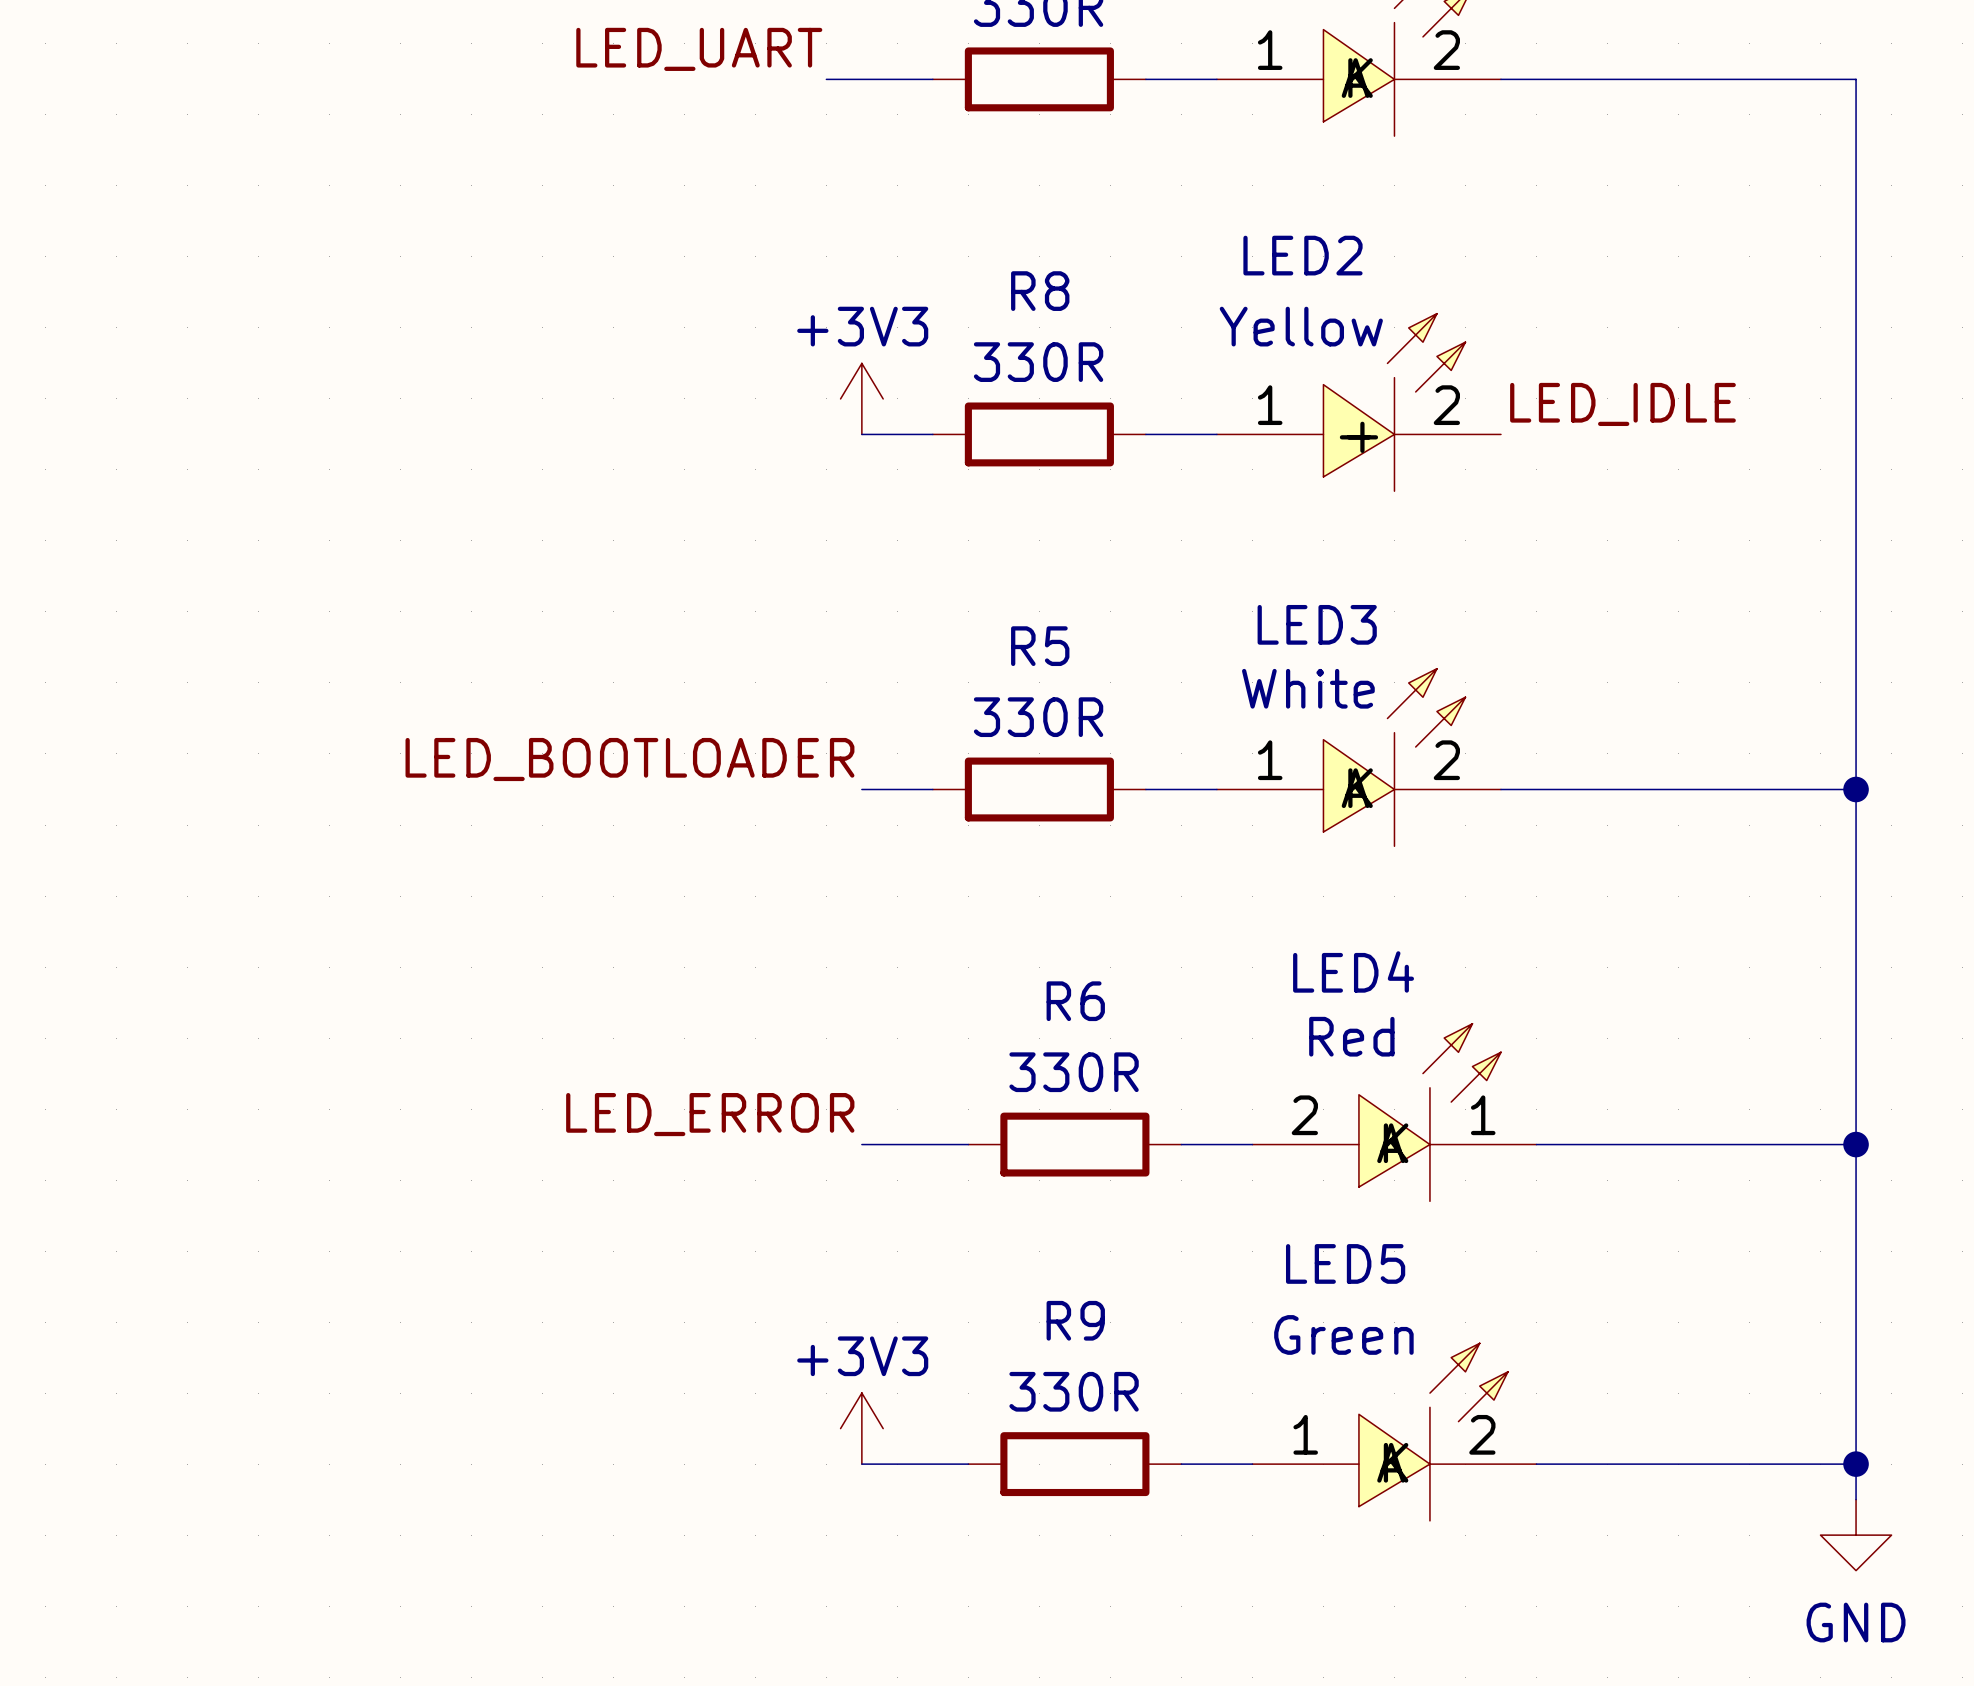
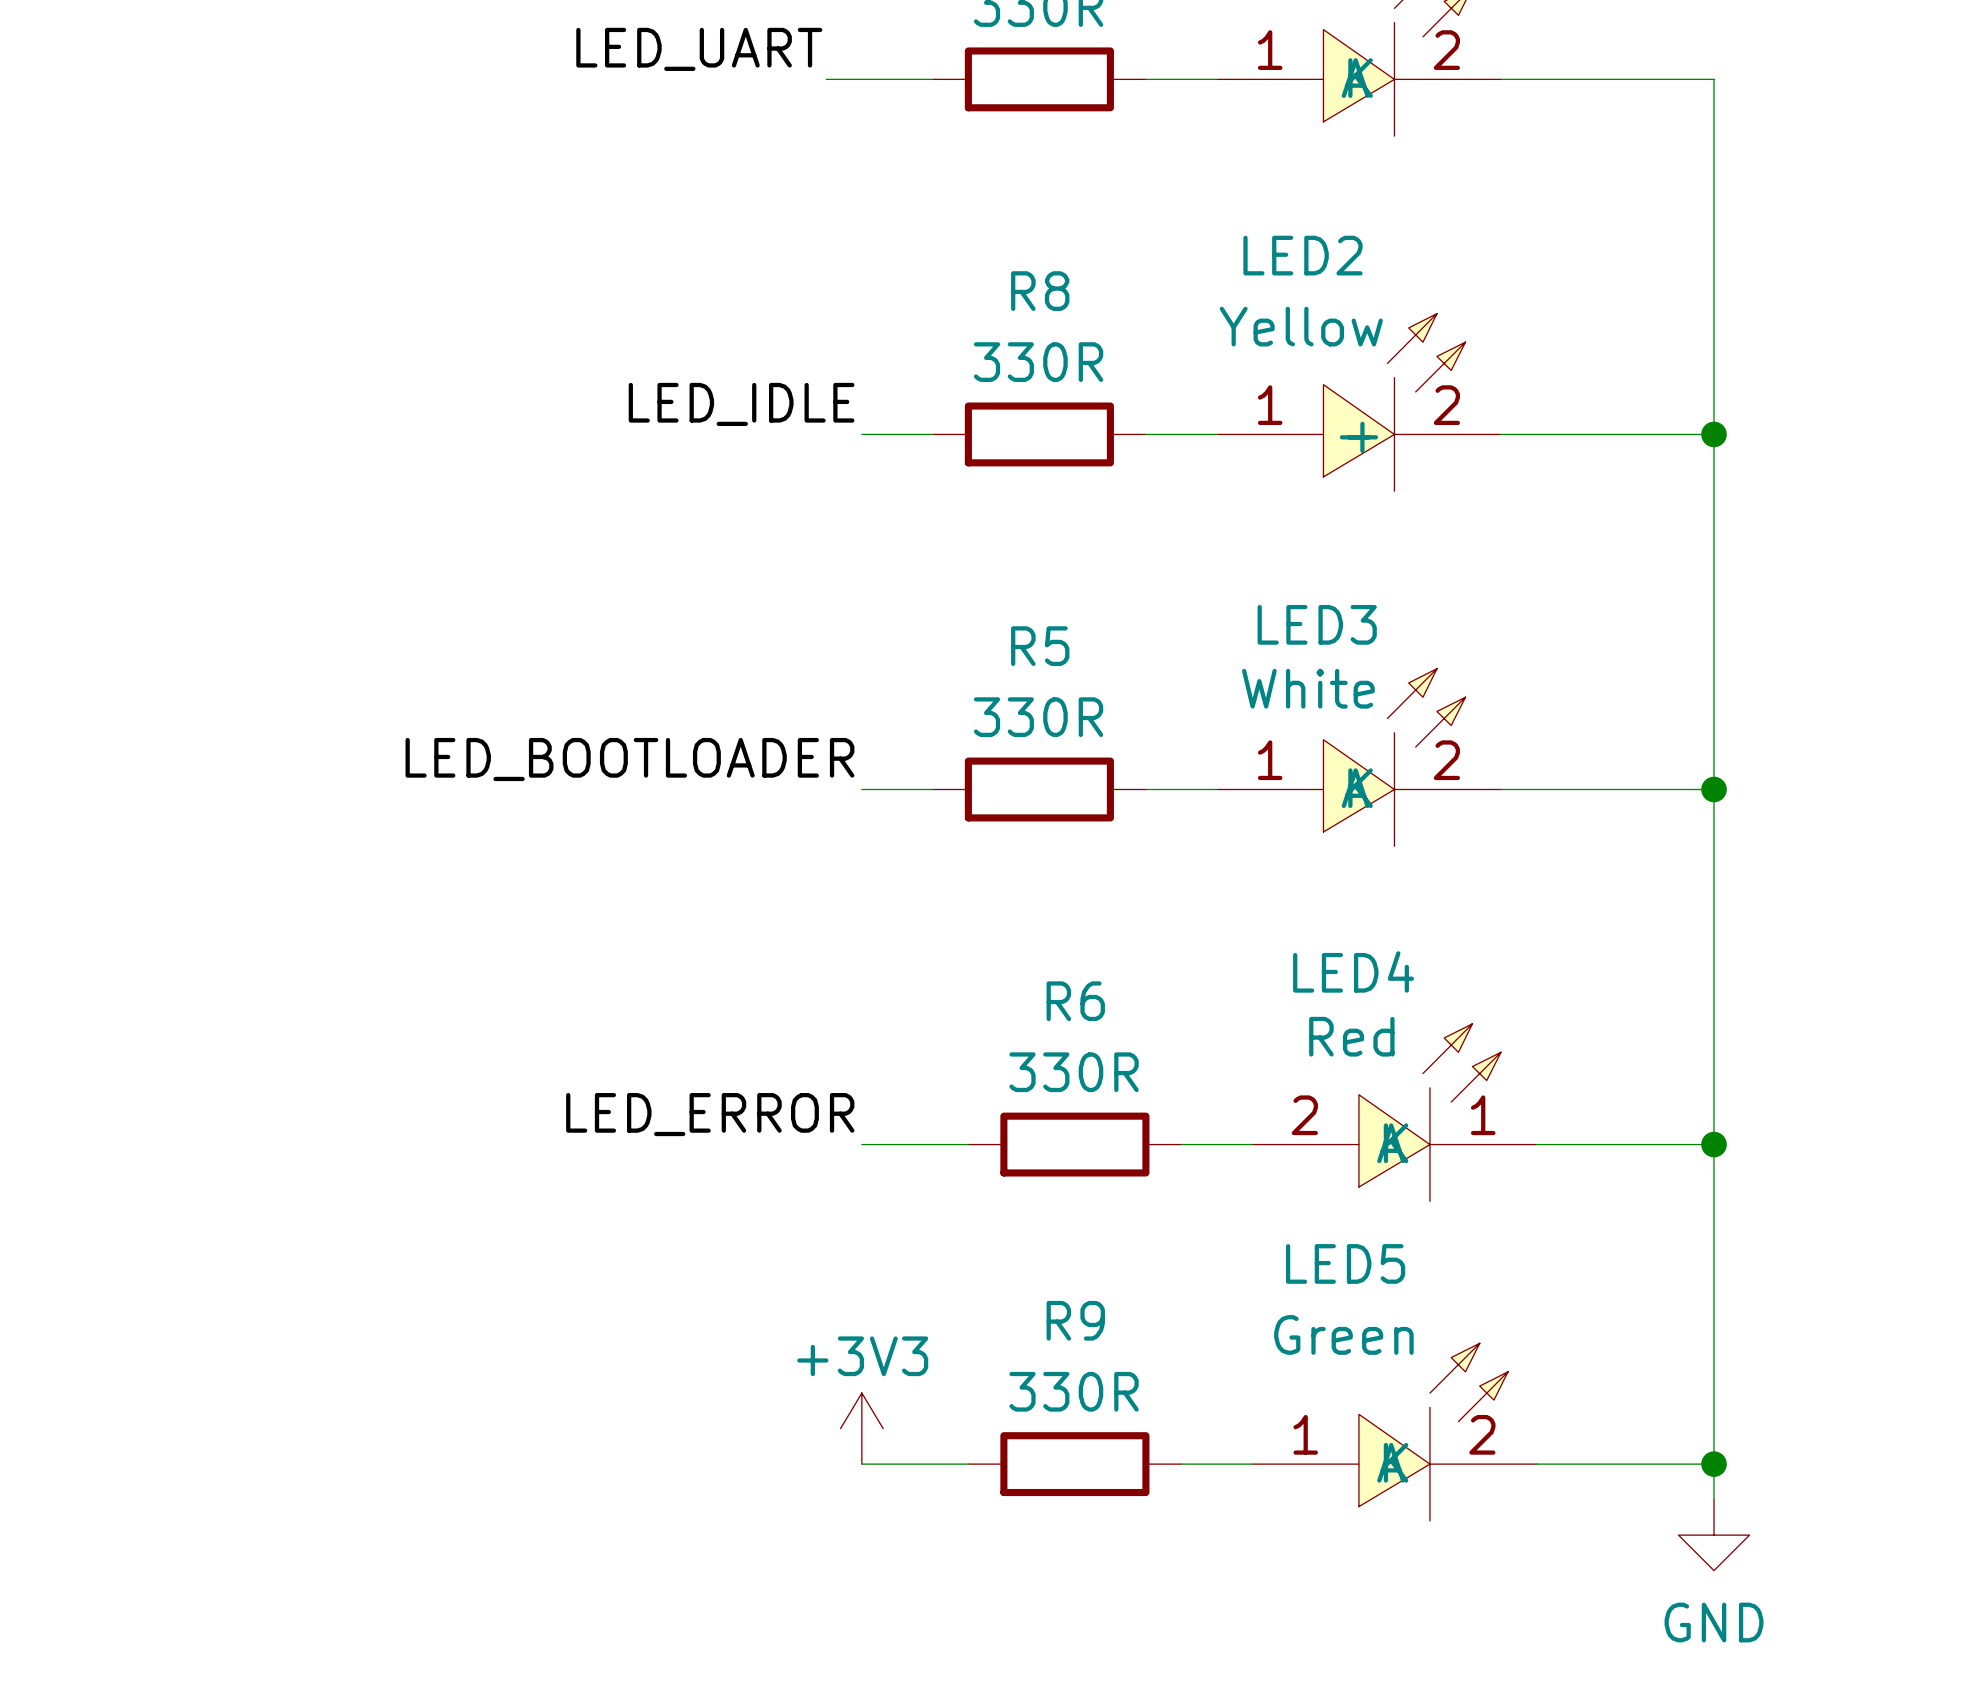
wire: (1714, 79) (1856, 79) (1856, 1499) -> (1714, 79) (1714, 1499)
power symbol: +3V3 (861, 398) -> none
label position: LED_IDLE (1622, 404) -> LED_IDLE (741, 404)
wire: none -> (1500, 434) (1714, 434)
junction: none -> (1714, 434)
wire: (1714, 789) (1856, 789) -> none
junction position: (1856, 789) -> (1714, 789)
wire: (1714, 1144) (1856, 1144) -> none
junction position: (1856, 1144) -> (1714, 1144)
wire: (1714, 1464) (1856, 1464) -> none
junction position: (1856, 1464) -> (1714, 1464)
power symbol position: GND (1856, 1535) -> GND (1714, 1535)

